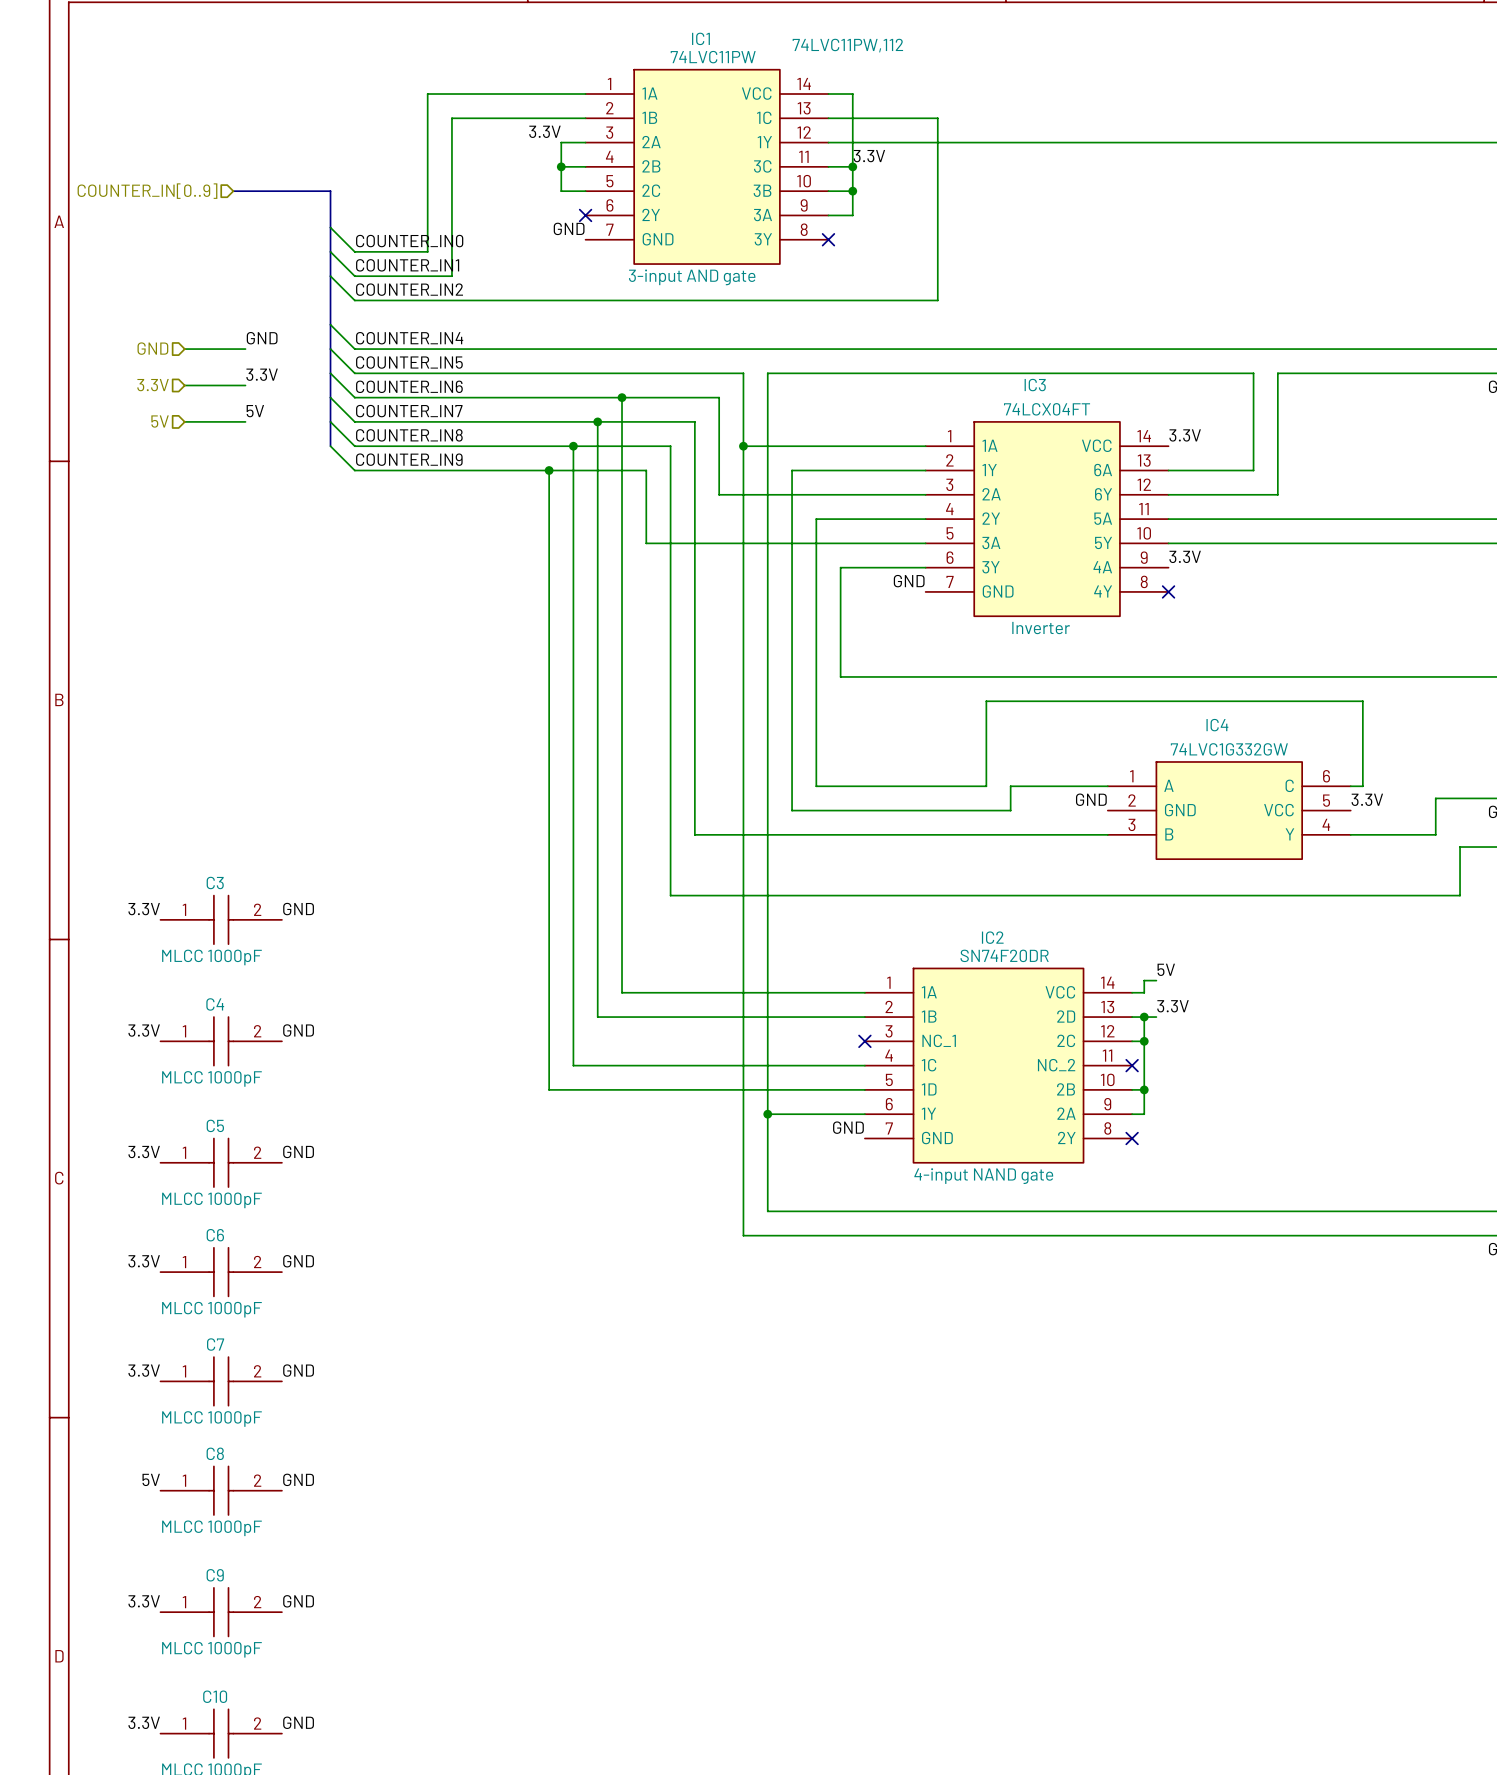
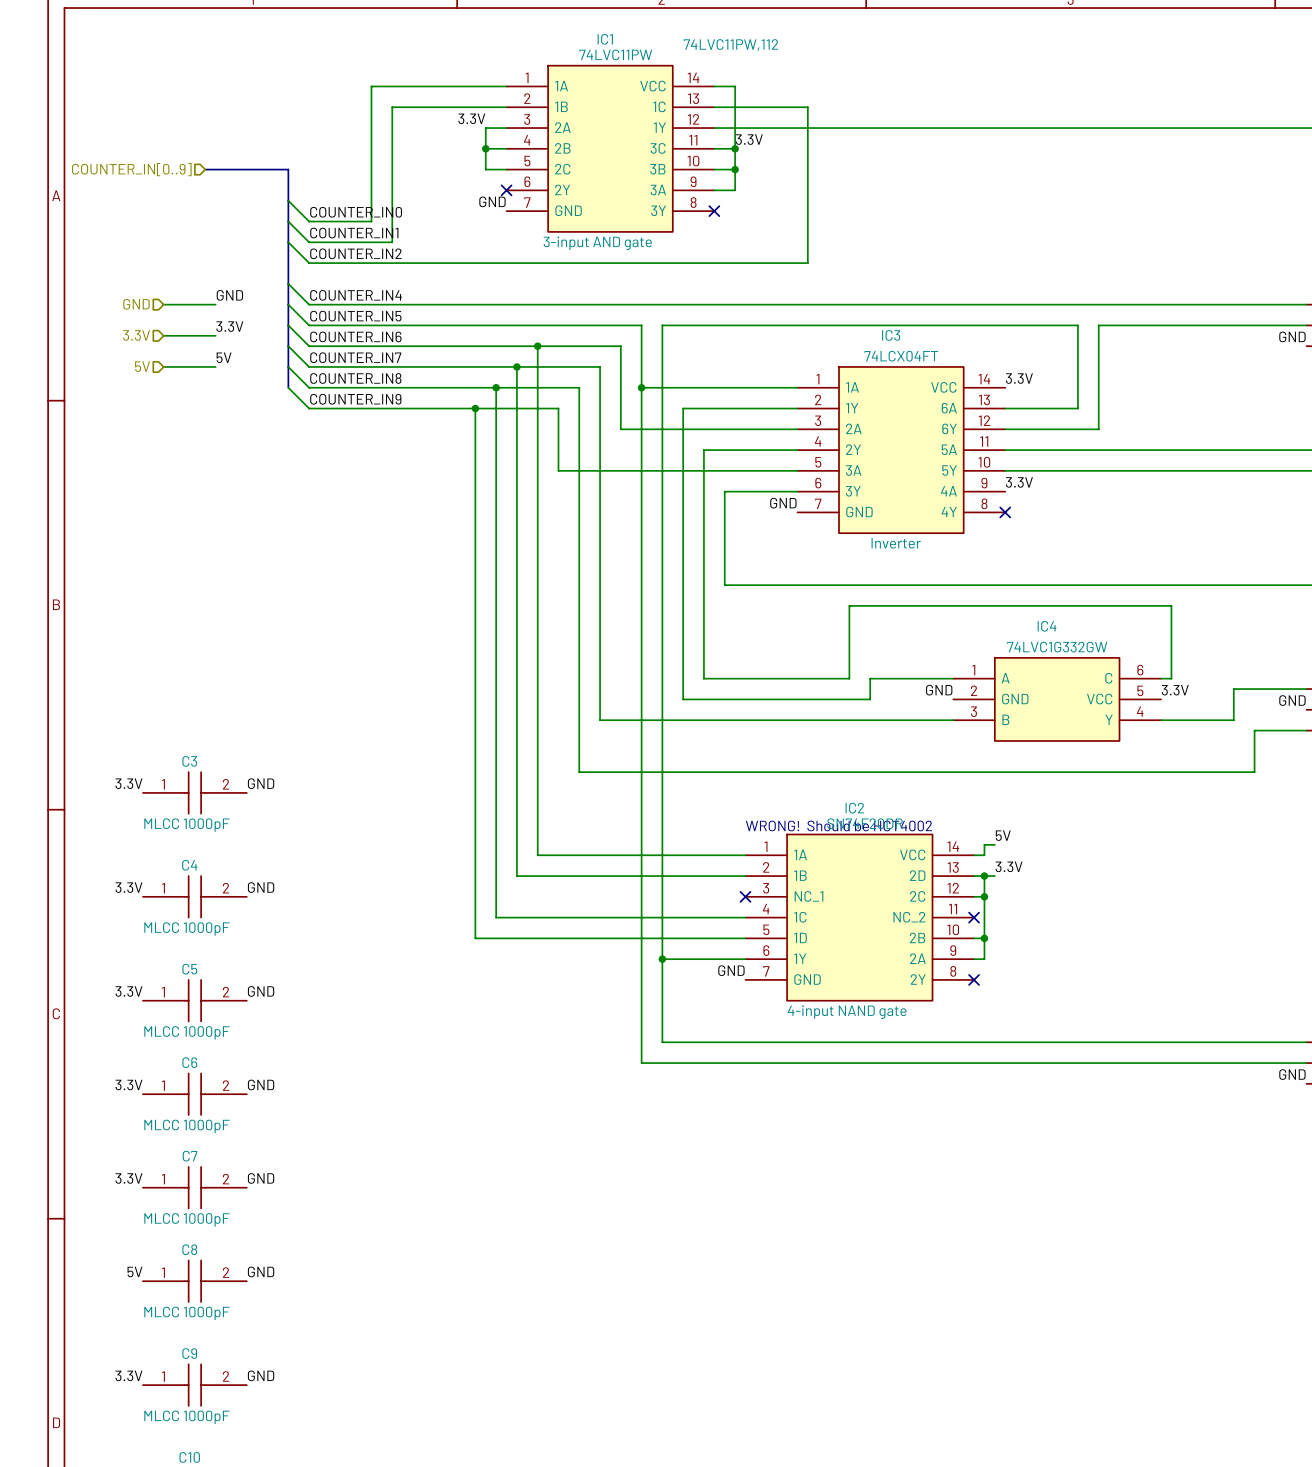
text: none -> WRONG! Should be HCT4002 (838, 825)

